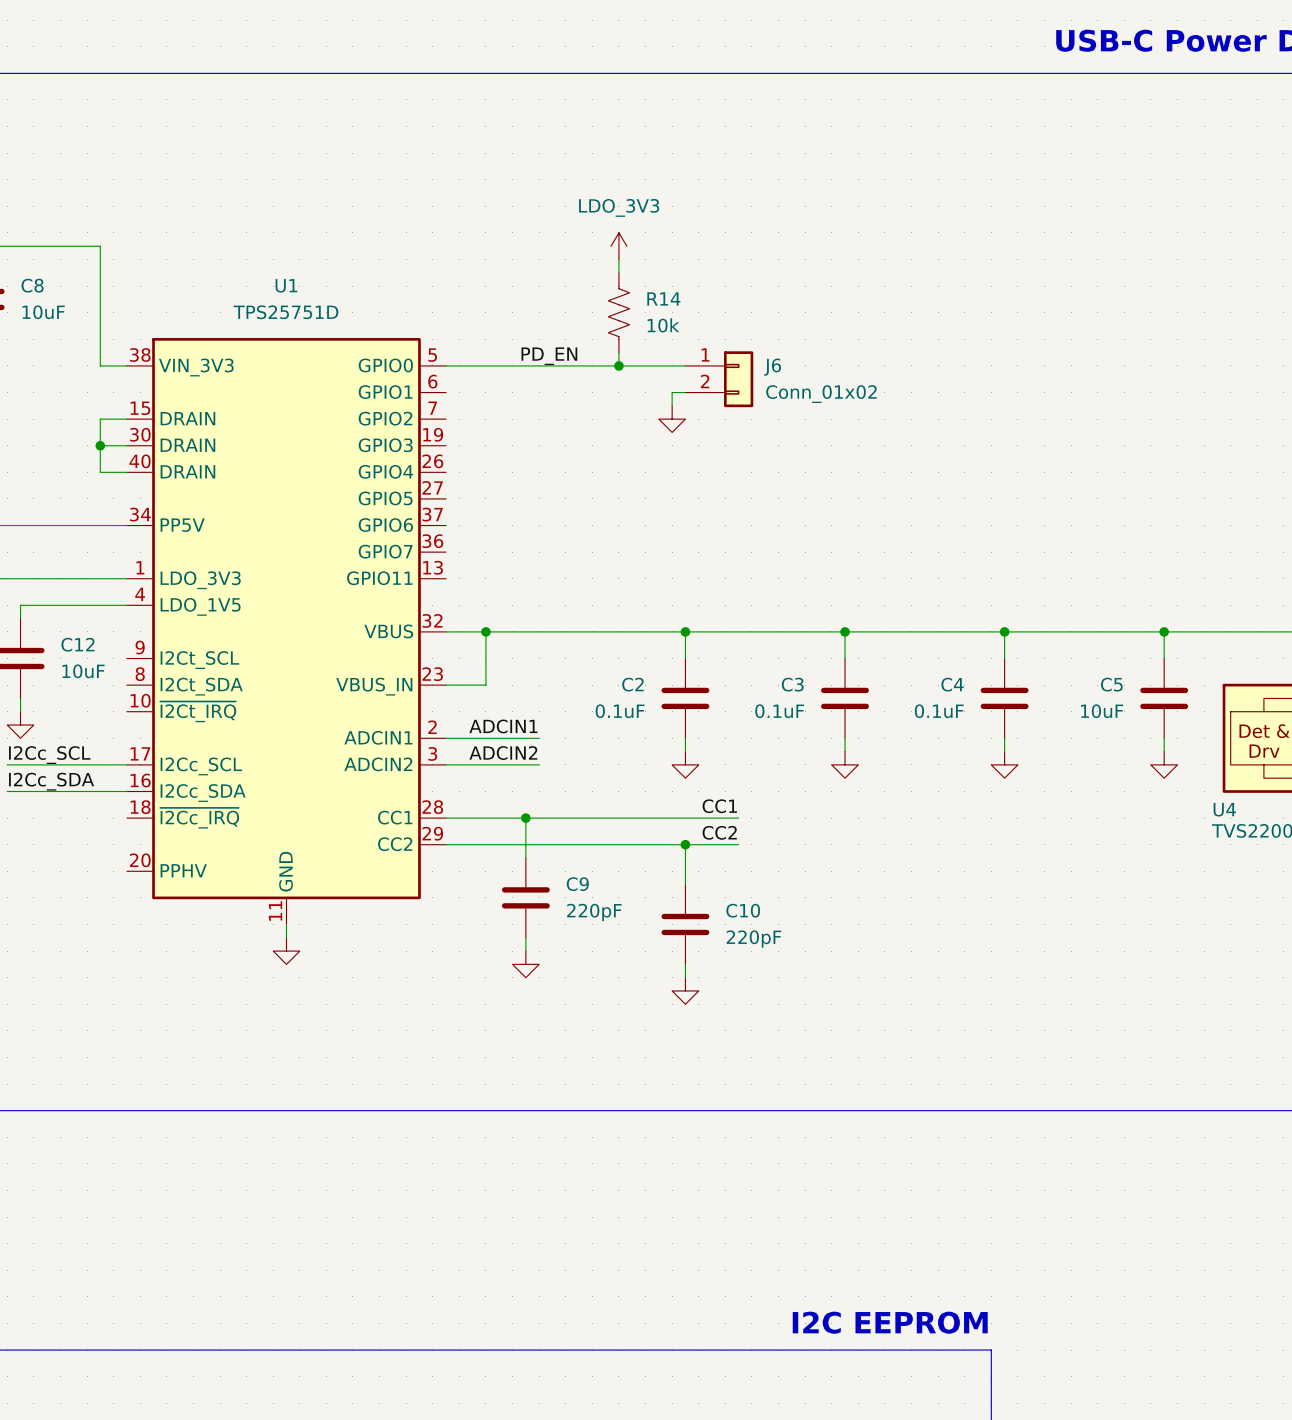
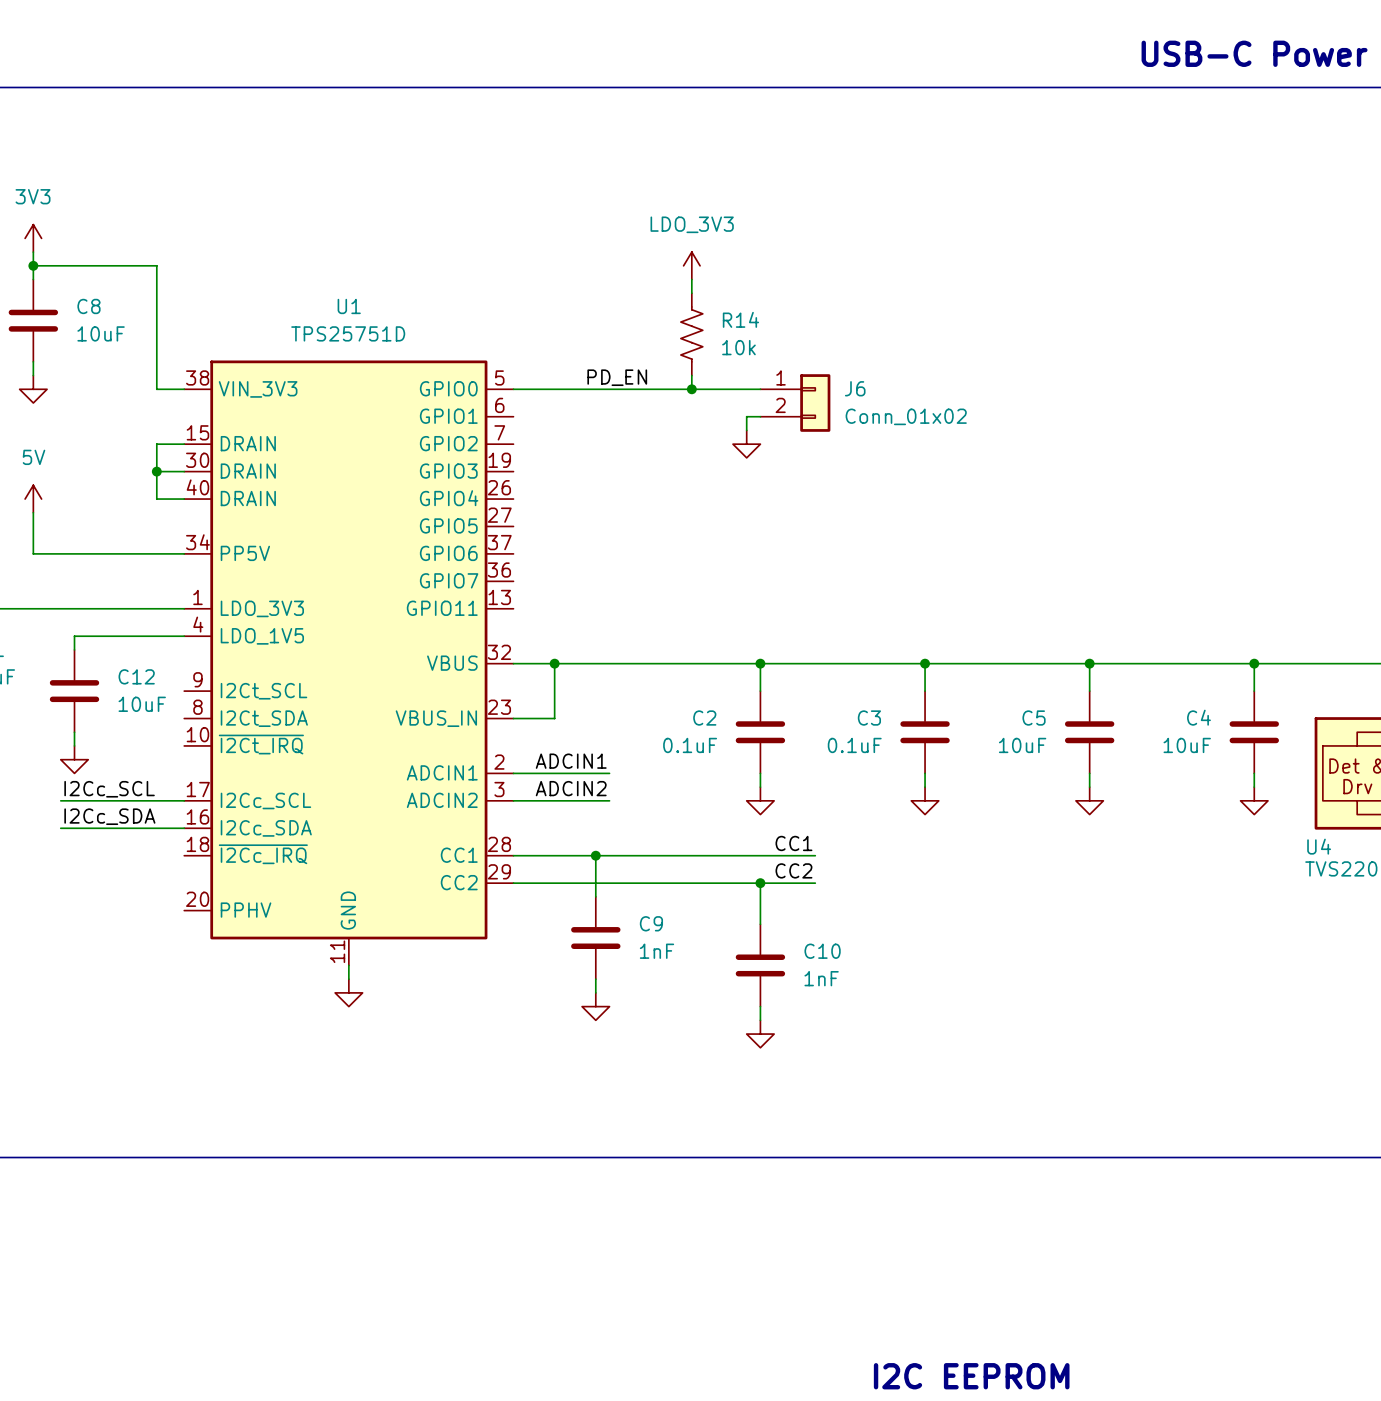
C4 name: C4 (952, 684) -> C5 (1034, 718)
C5 name: C5 (1111, 684) -> C4 (1198, 717)
C4 value: 0.1uF (939, 711) -> 10uF (1022, 745)
C9 value: 220pF (594, 912) -> 1nF (656, 951)
C10 value: 220pF (753, 939) -> 1nF (821, 978)

